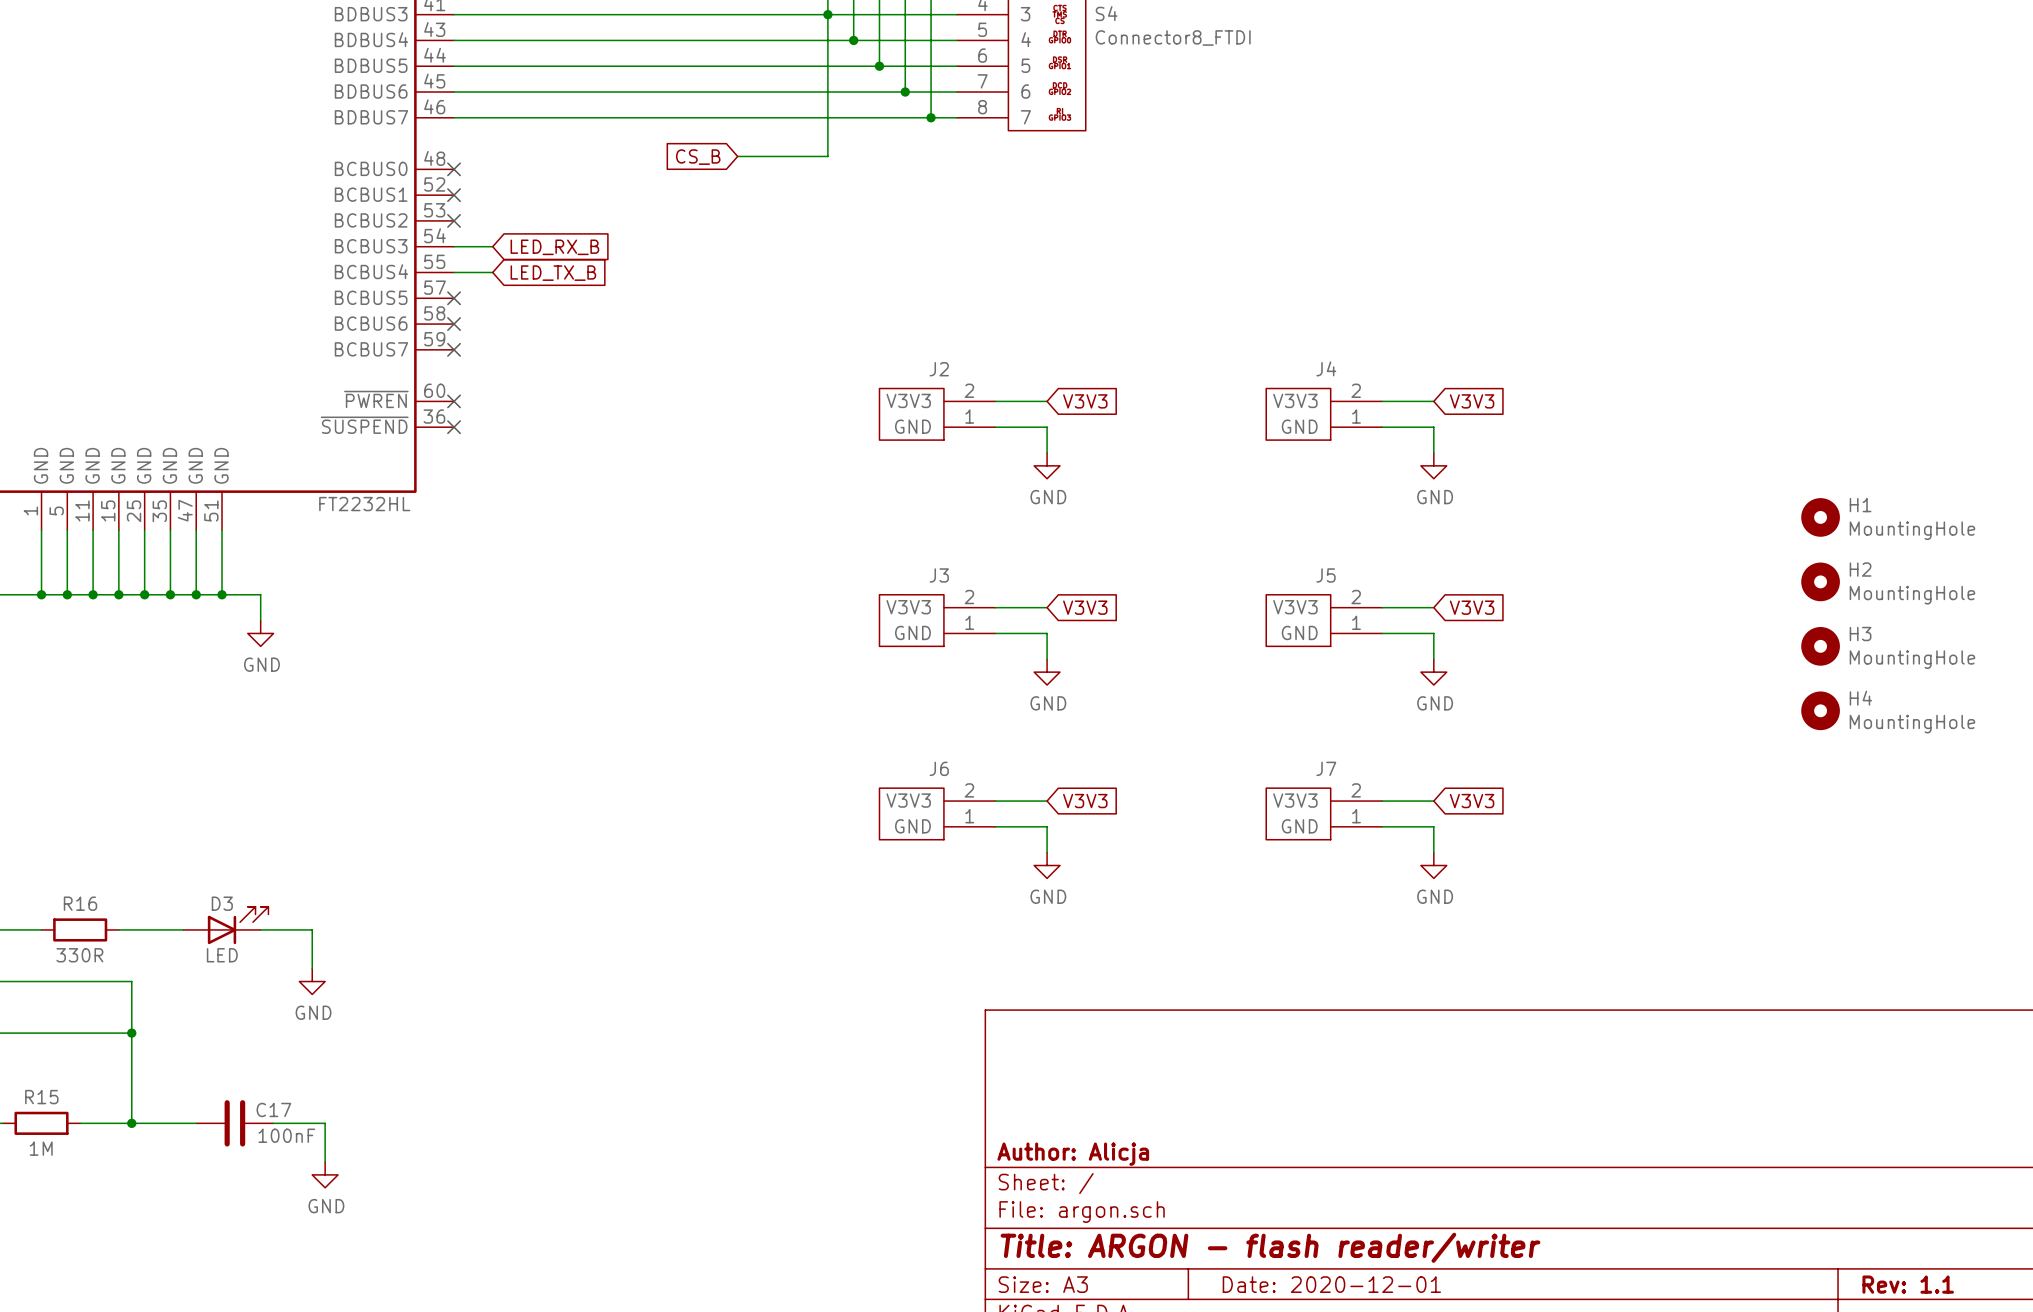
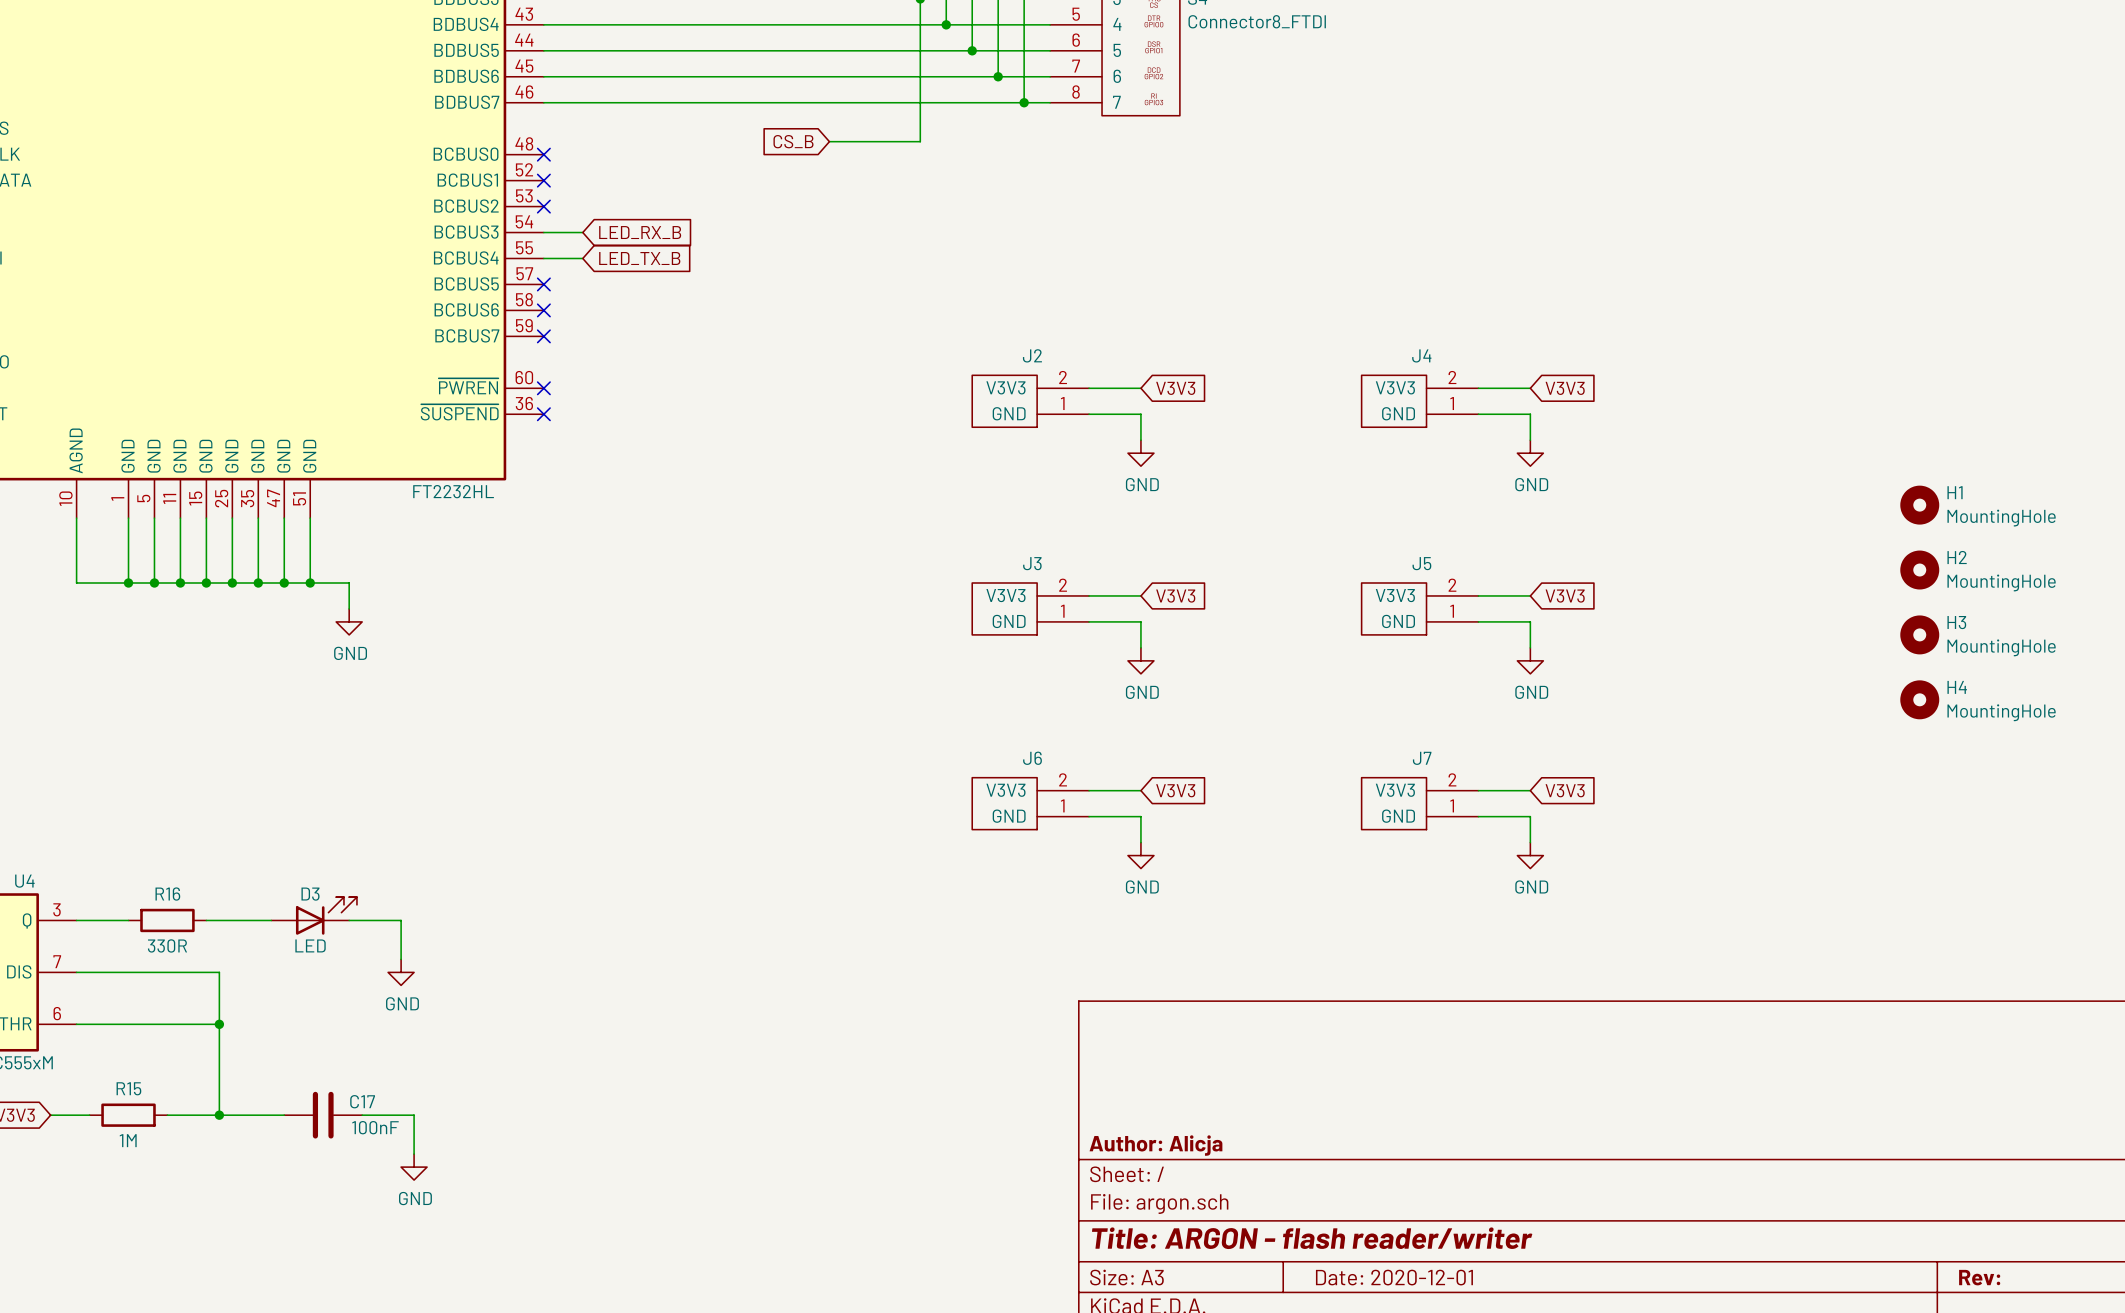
title block: Rev: 1.1 (1908, 1284) -> Rev: (1979, 1277)

